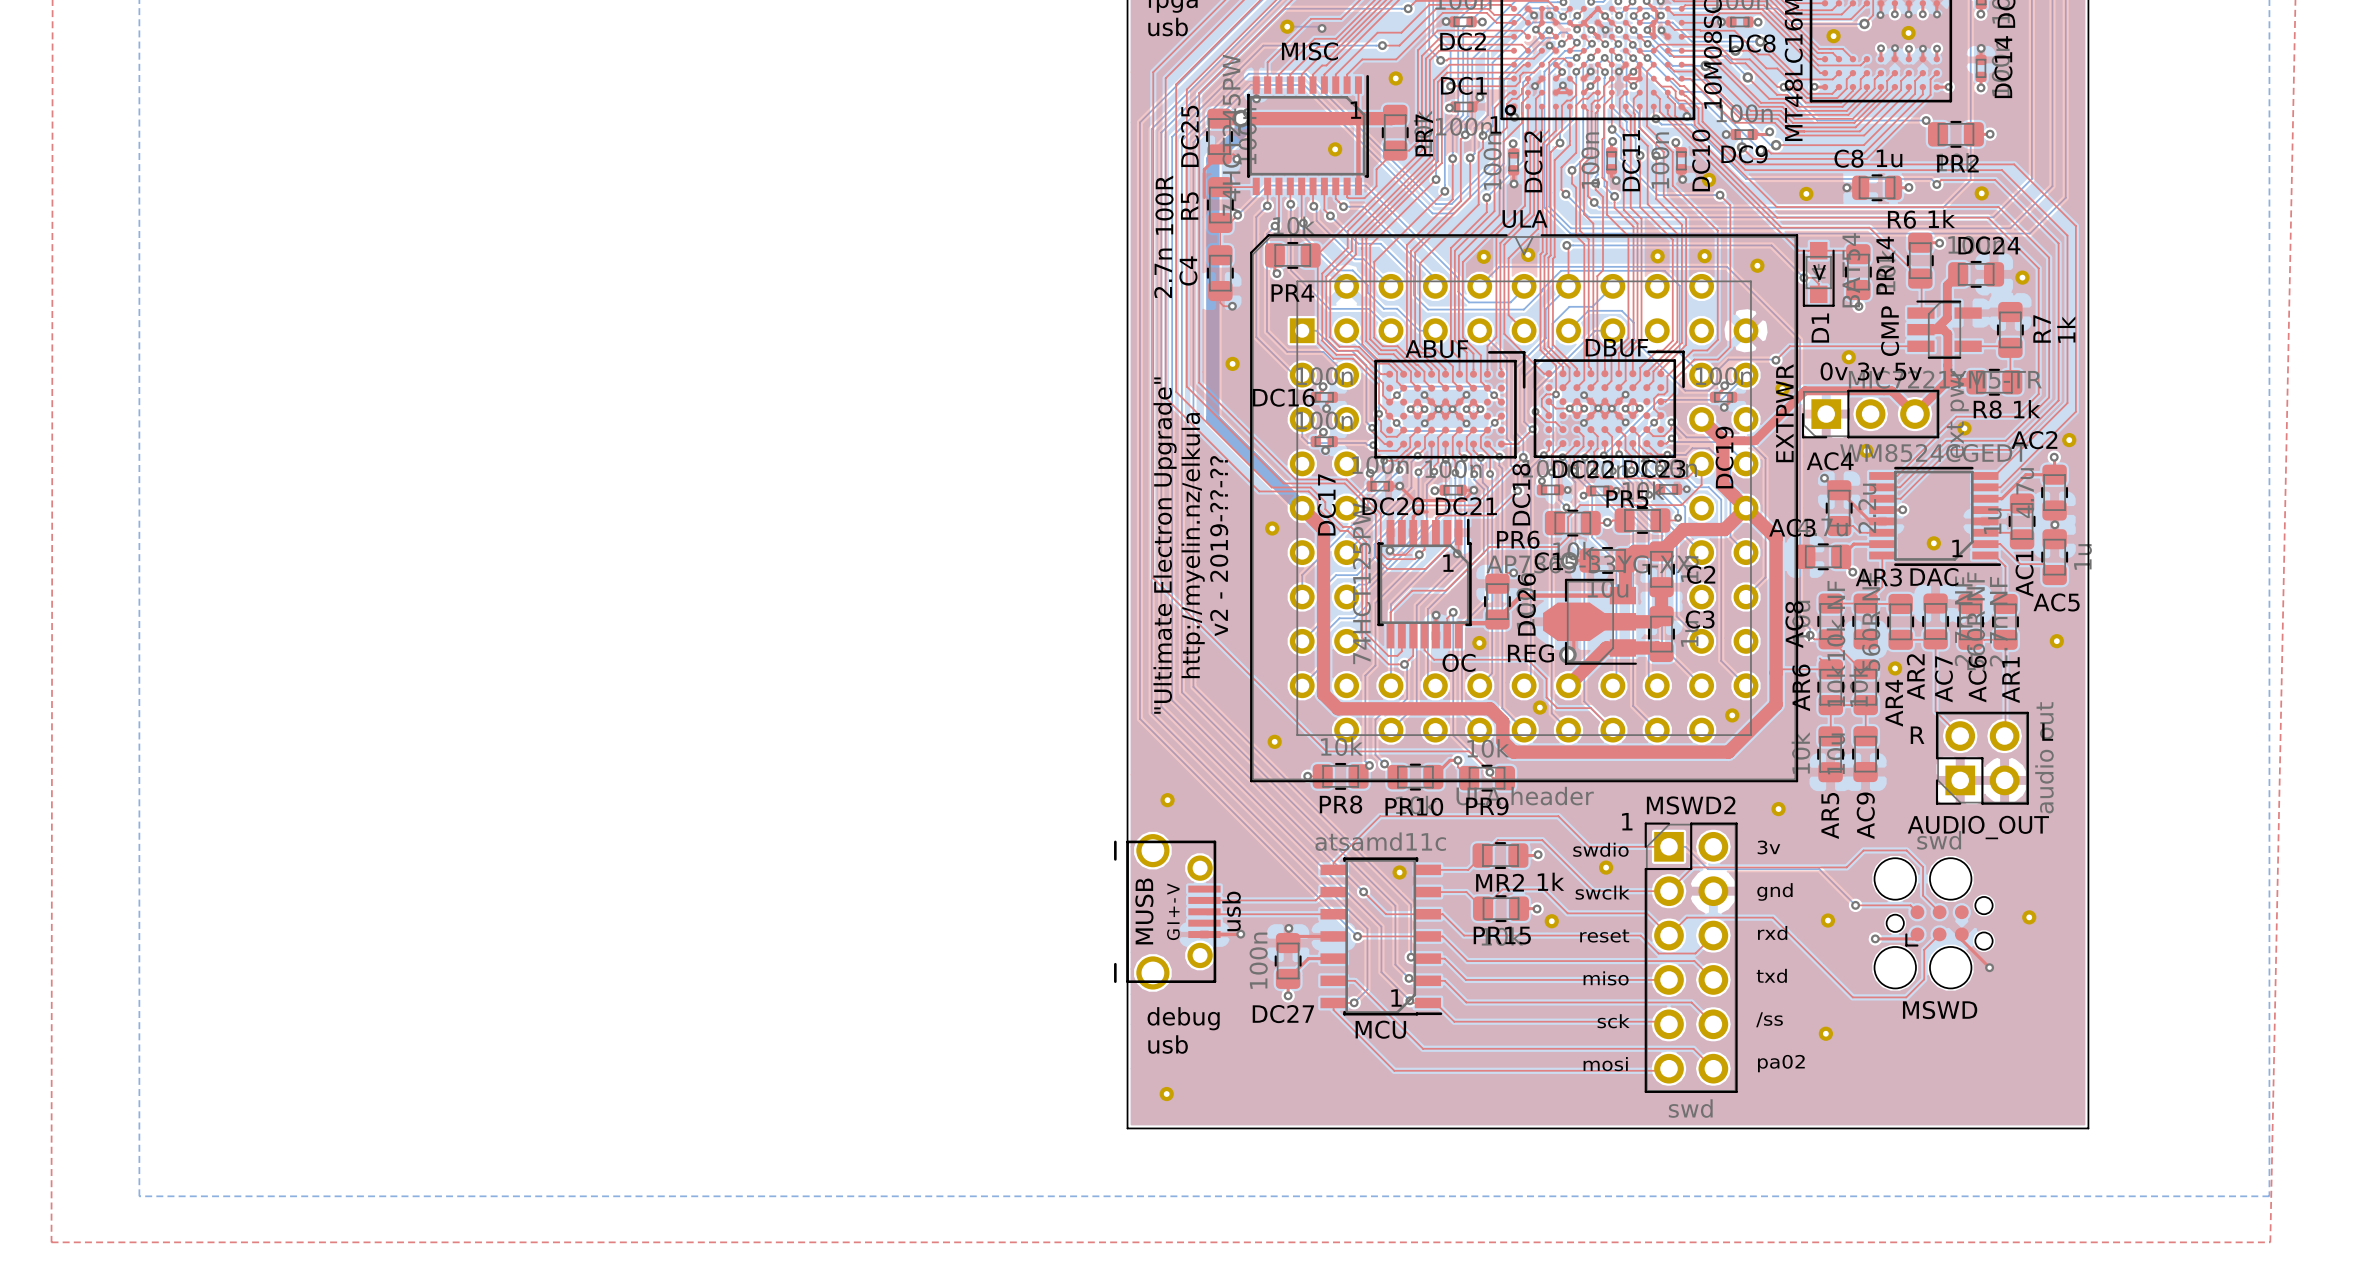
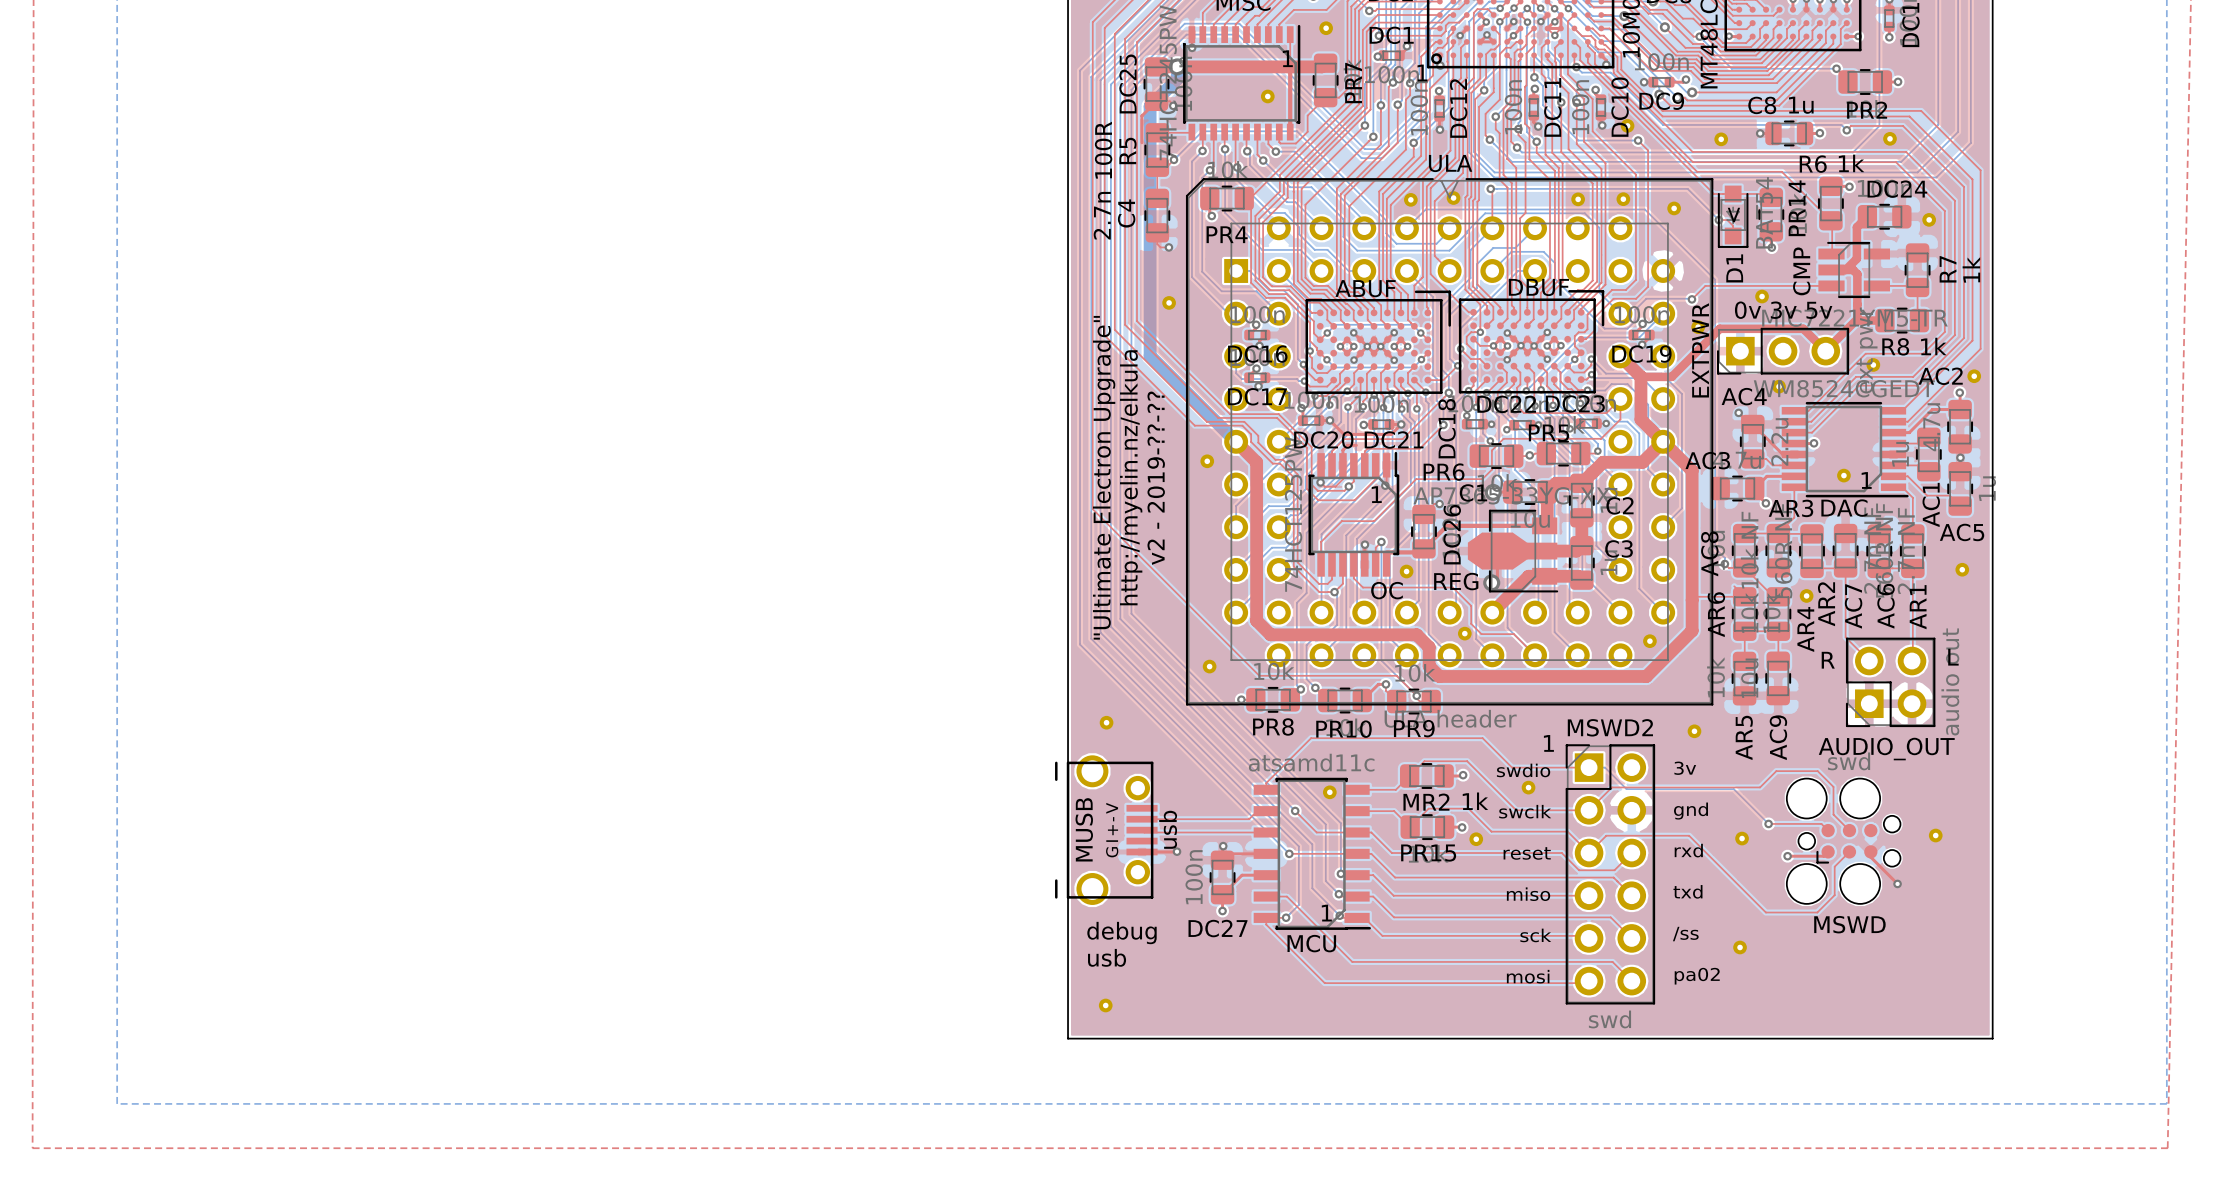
DC16 name position: DC16 (1283, 397) -> DC16 (1257, 354)
DC19 name rotation: 0° (1724, 457) -> 90° clockwise (1641, 354)
DC17 name rotation: 0° (1326, 504) -> 90° clockwise (1257, 396)

